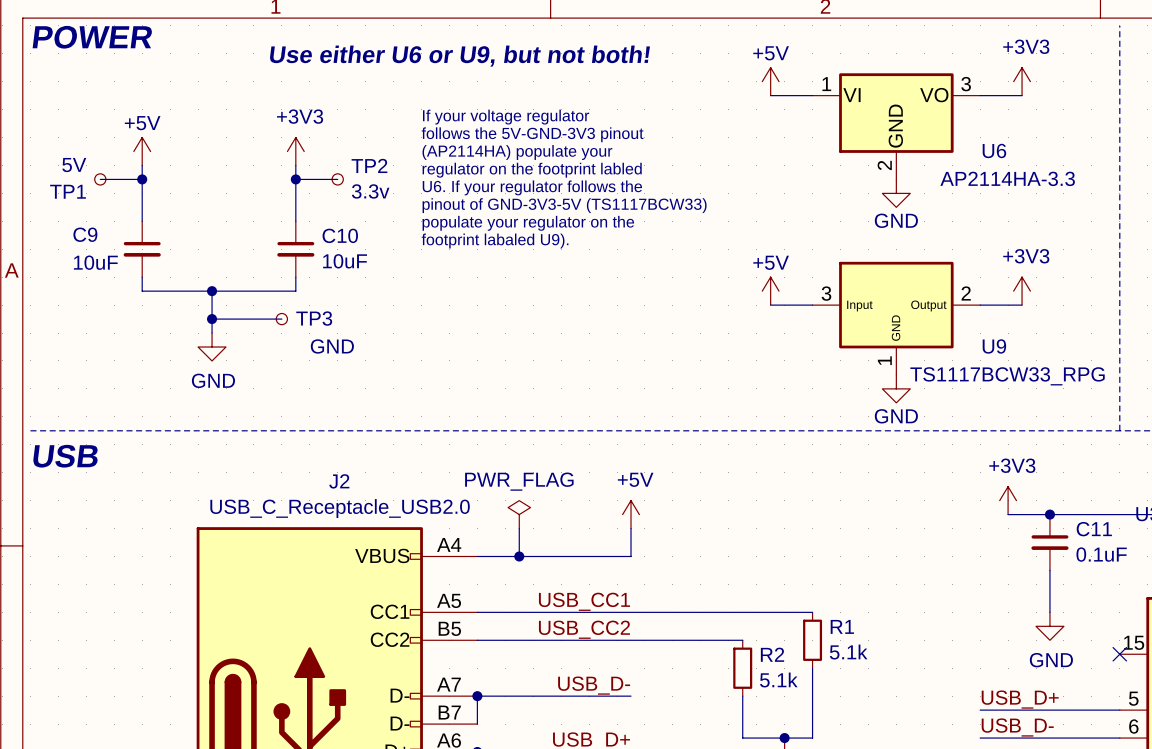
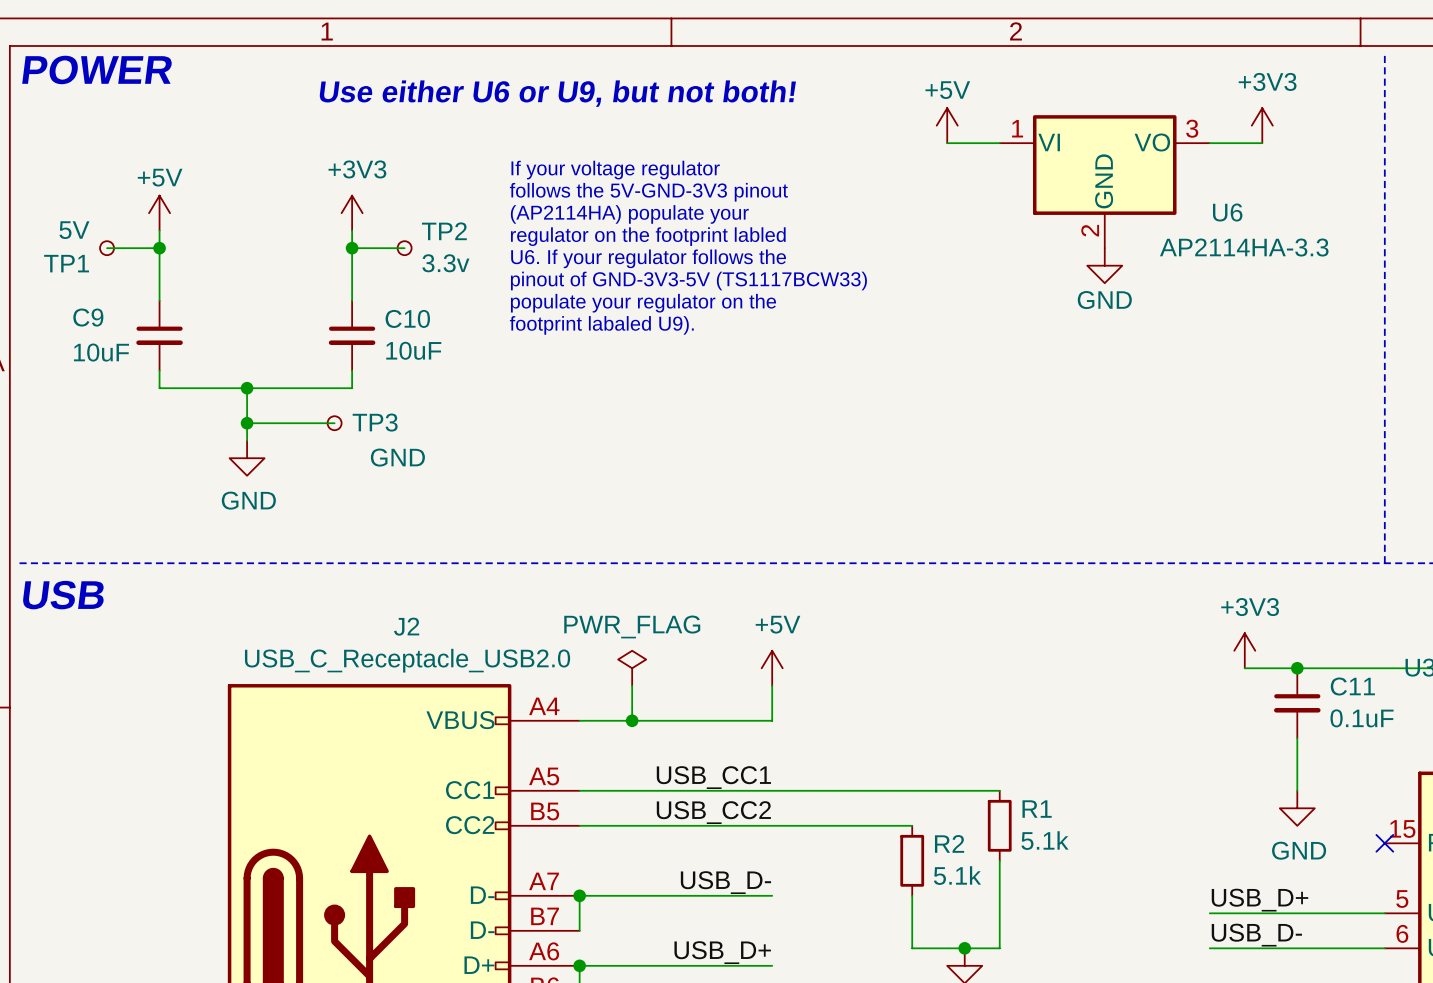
power symbol: +5V (770, 291) -> none
power symbol: +3V3 (1022, 291) -> none
wire: (770, 305) (812, 305) -> none
wire: (980, 305) (1022, 305) -> none
U9: TS1117BCW33_RPG (896, 318) -> none
power symbol: GND (896, 388) -> none

